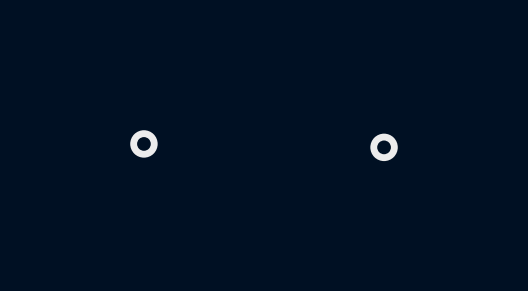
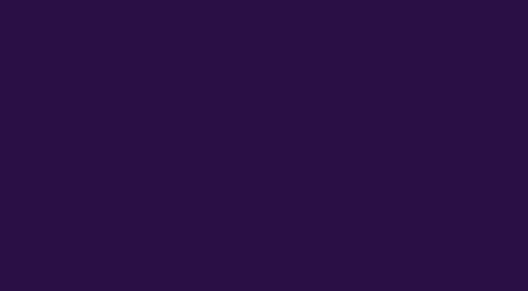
via: (143, 143) -> none
via: (384, 147) -> none

